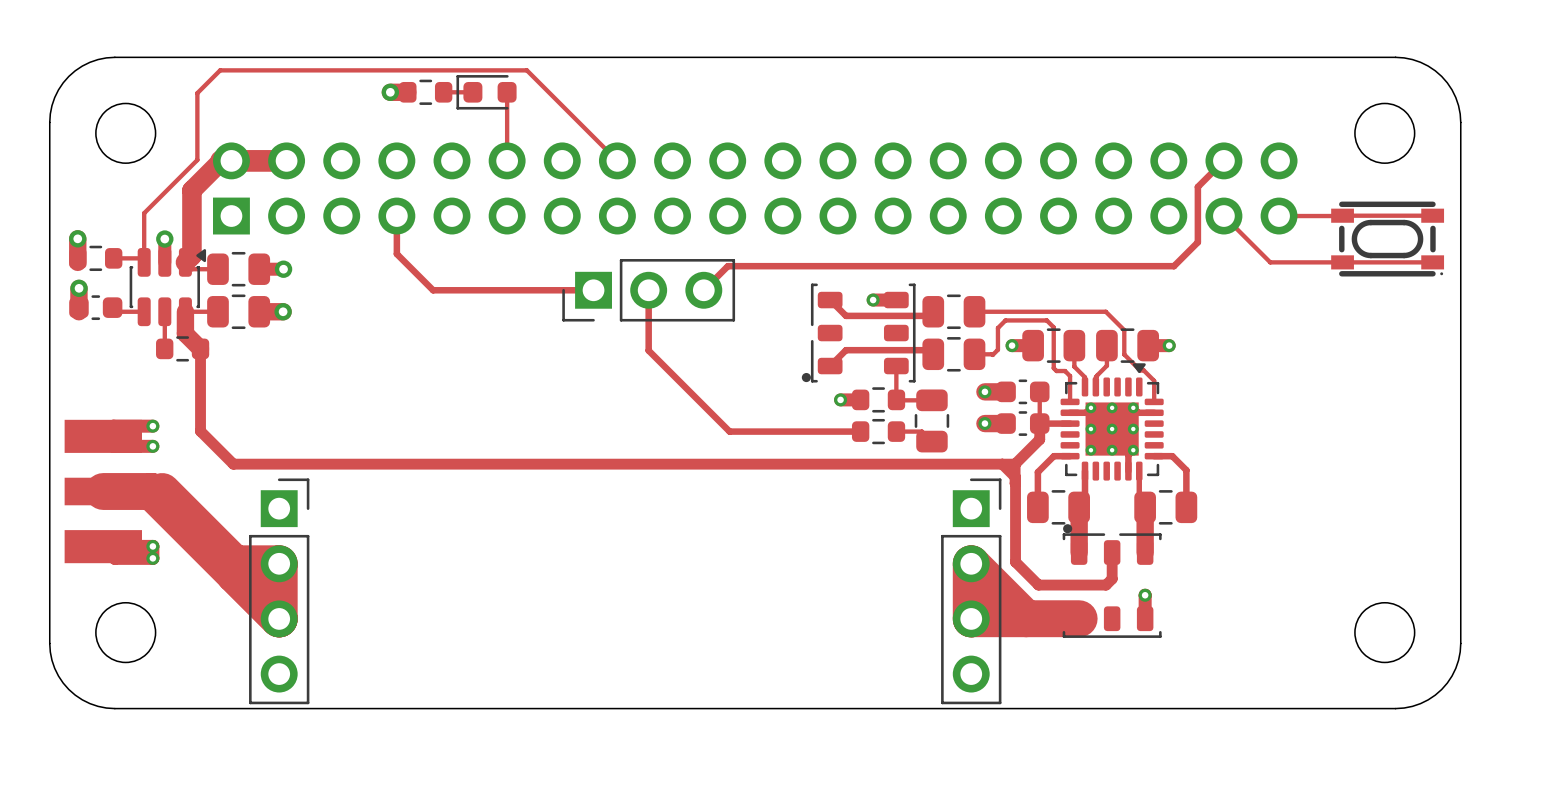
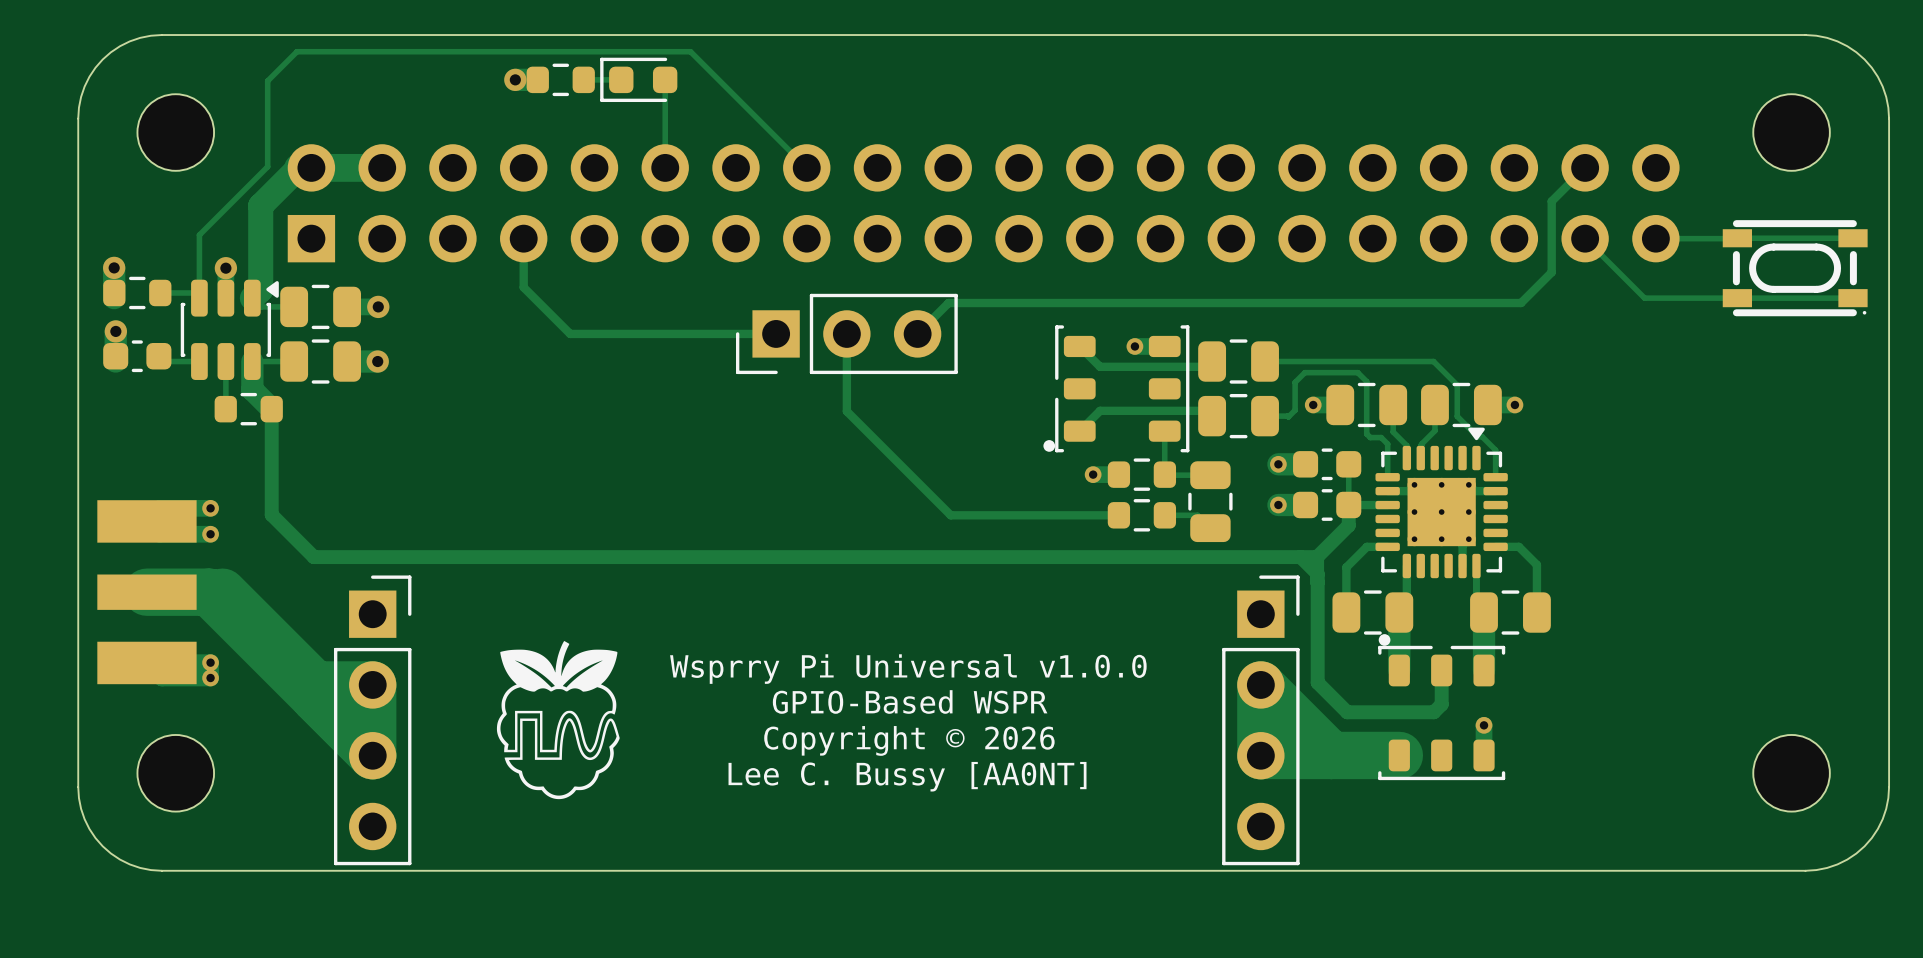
drawing: none -> [496, 641, 620, 800]
text: none -> Wsprry Pi Universal v1.0.0 (908, 668)
text: none -> GPIO-Based WSPR (910, 701)
text: none -> Copyright © 2026 (909, 740)
text: none -> Lee C. Bussy [AA0NT] (907, 776)

